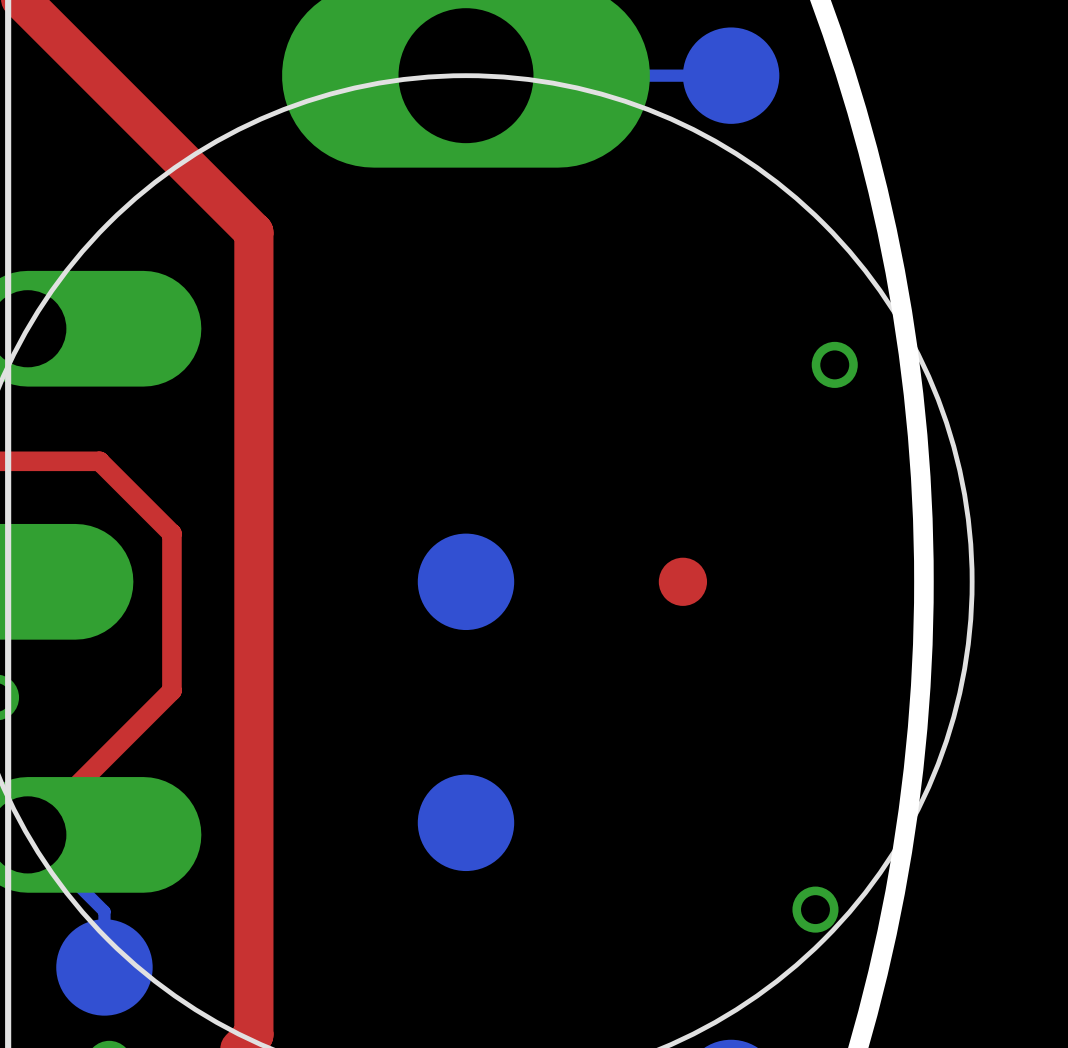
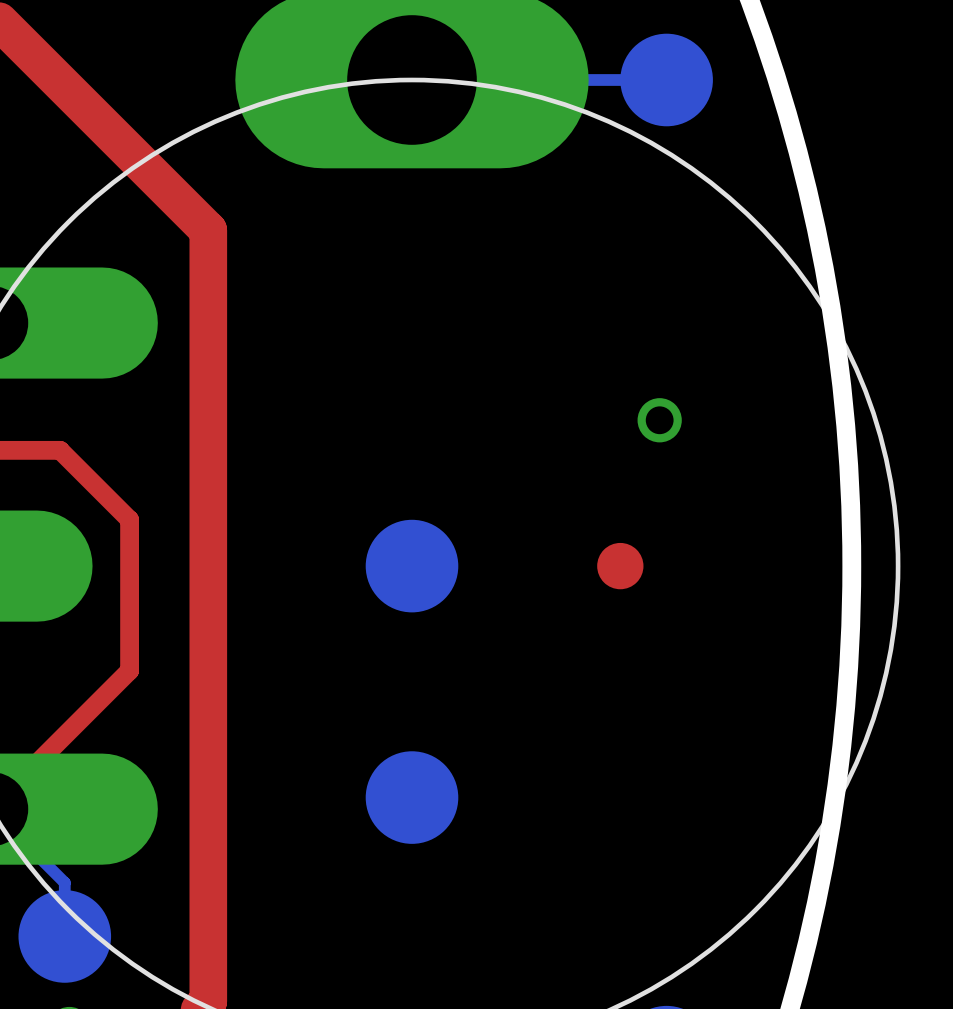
via position: (834, 364) -> (659, 420)
via: (815, 909) -> none

